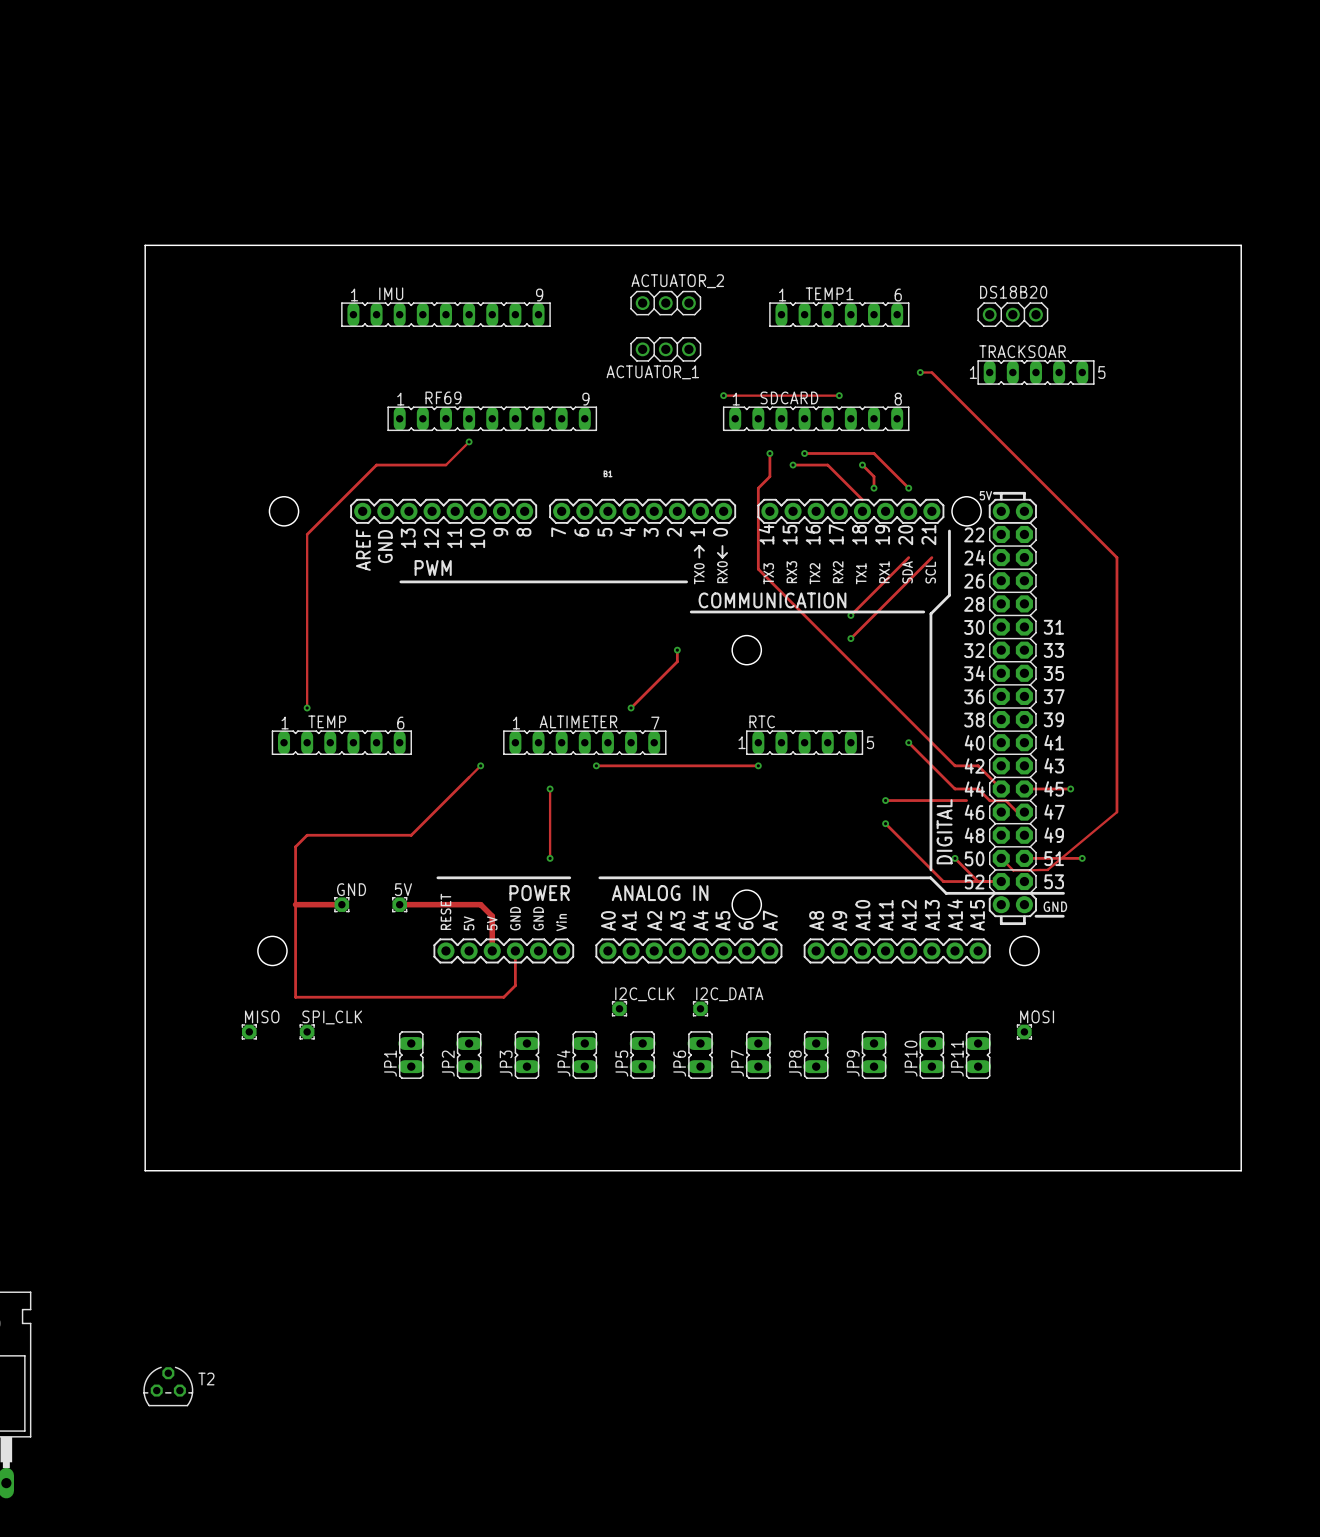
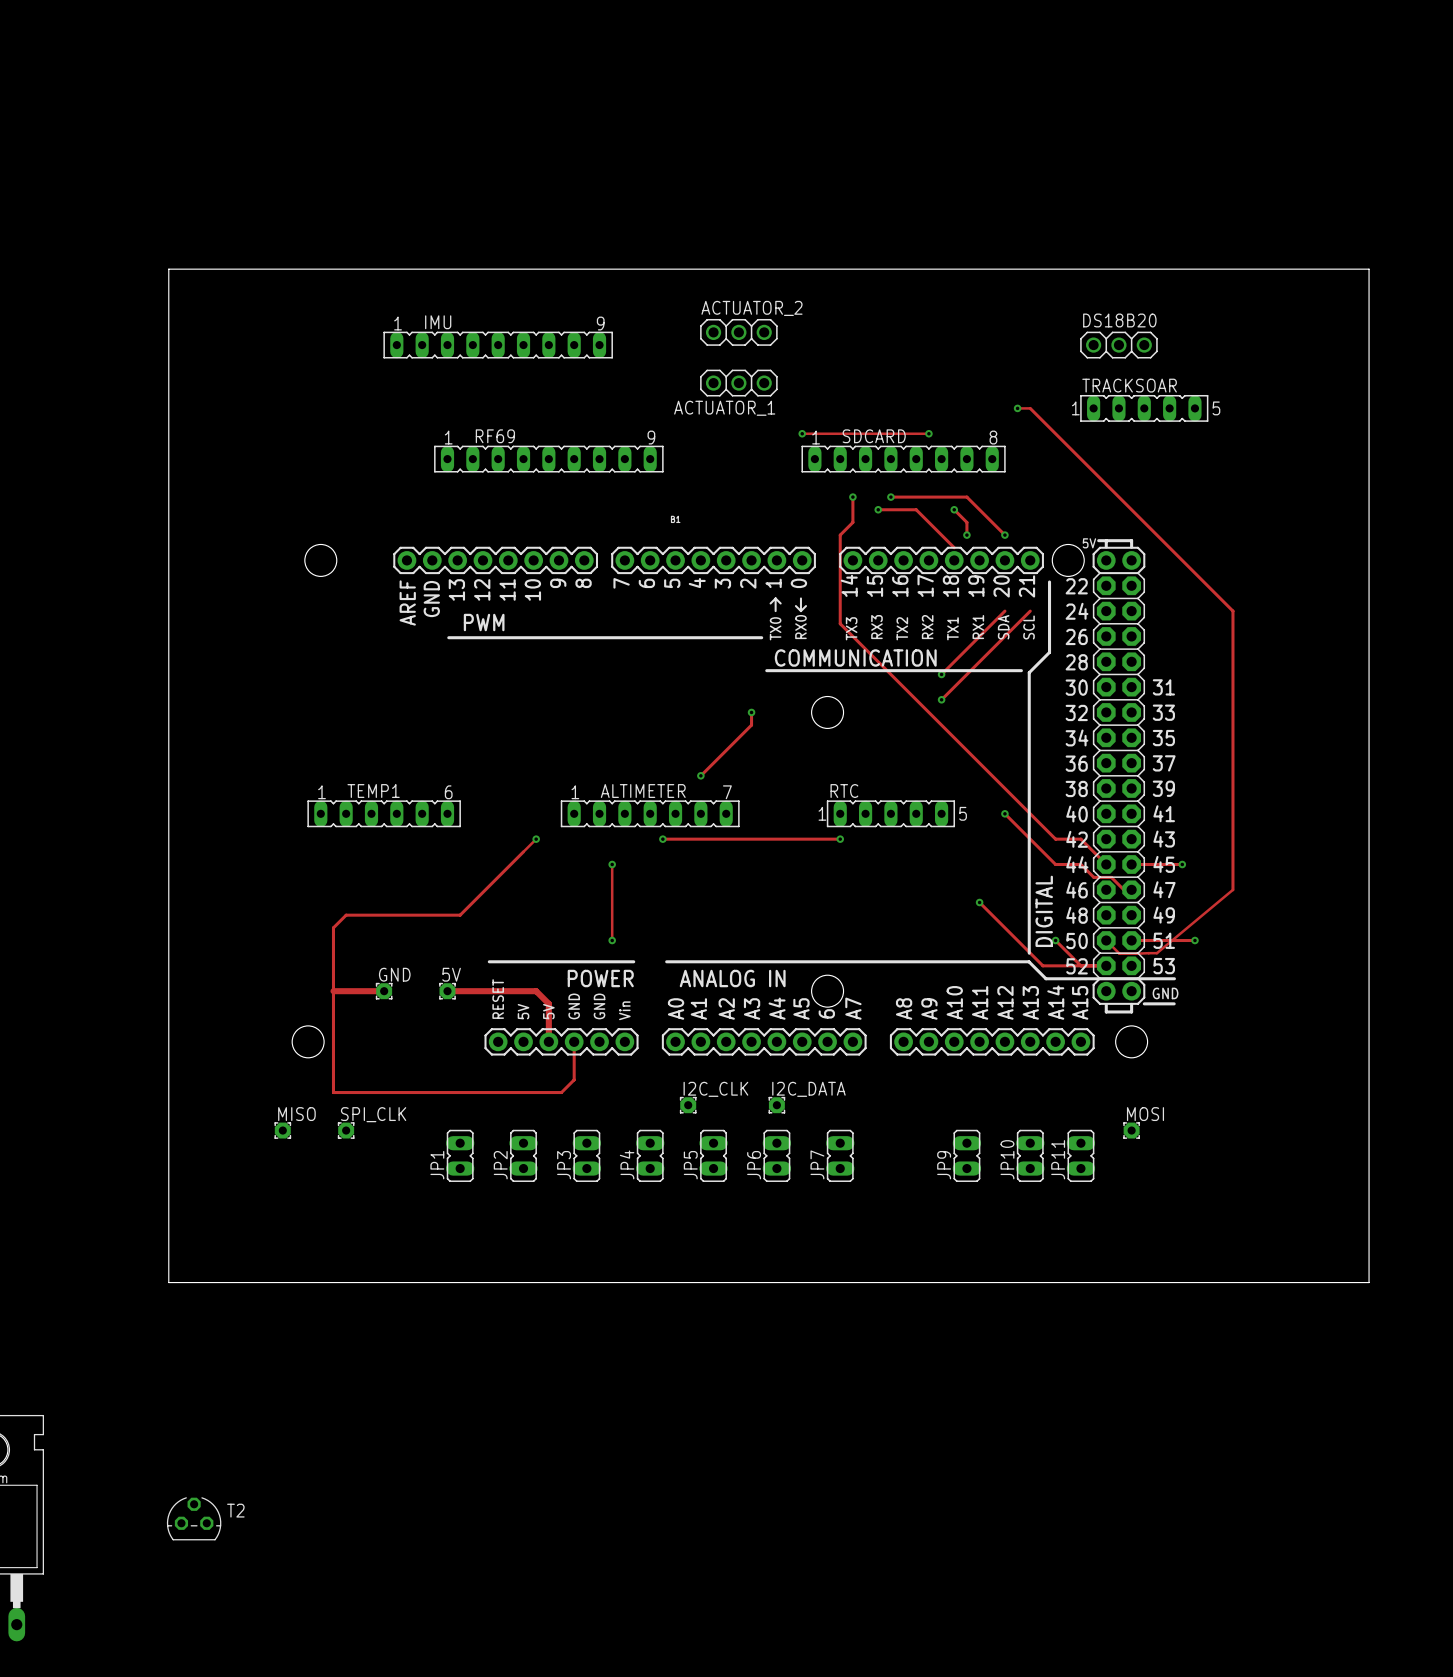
TEMP1: (839, 314) -> none
track: (469, 441) (445, 465) (376, 465) (307, 534) (307, 708) -> none
via: (469, 441) -> none
via: (307, 708) -> none
TEMP name: TEMP (327, 721) -> TEMP1 (373, 791)
track: (885, 800) (966, 800) -> none
via: (885, 800) -> none
JP8: (816, 1055) -> none

